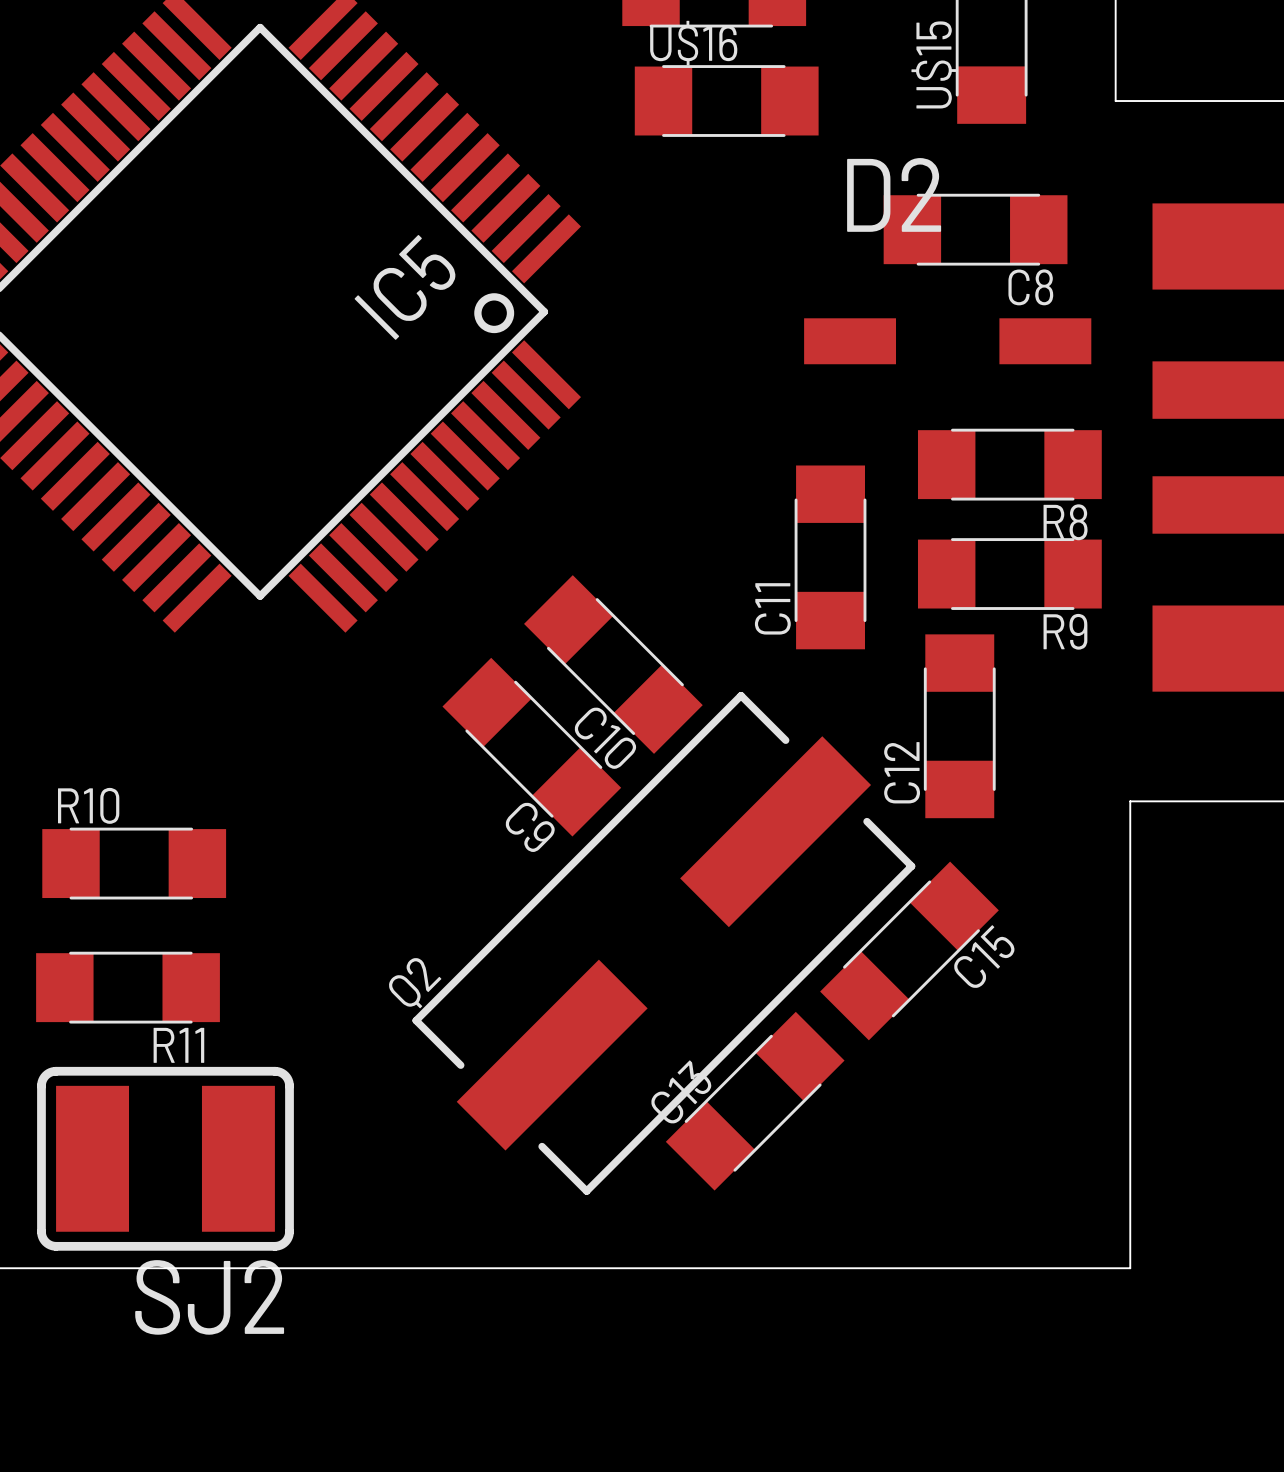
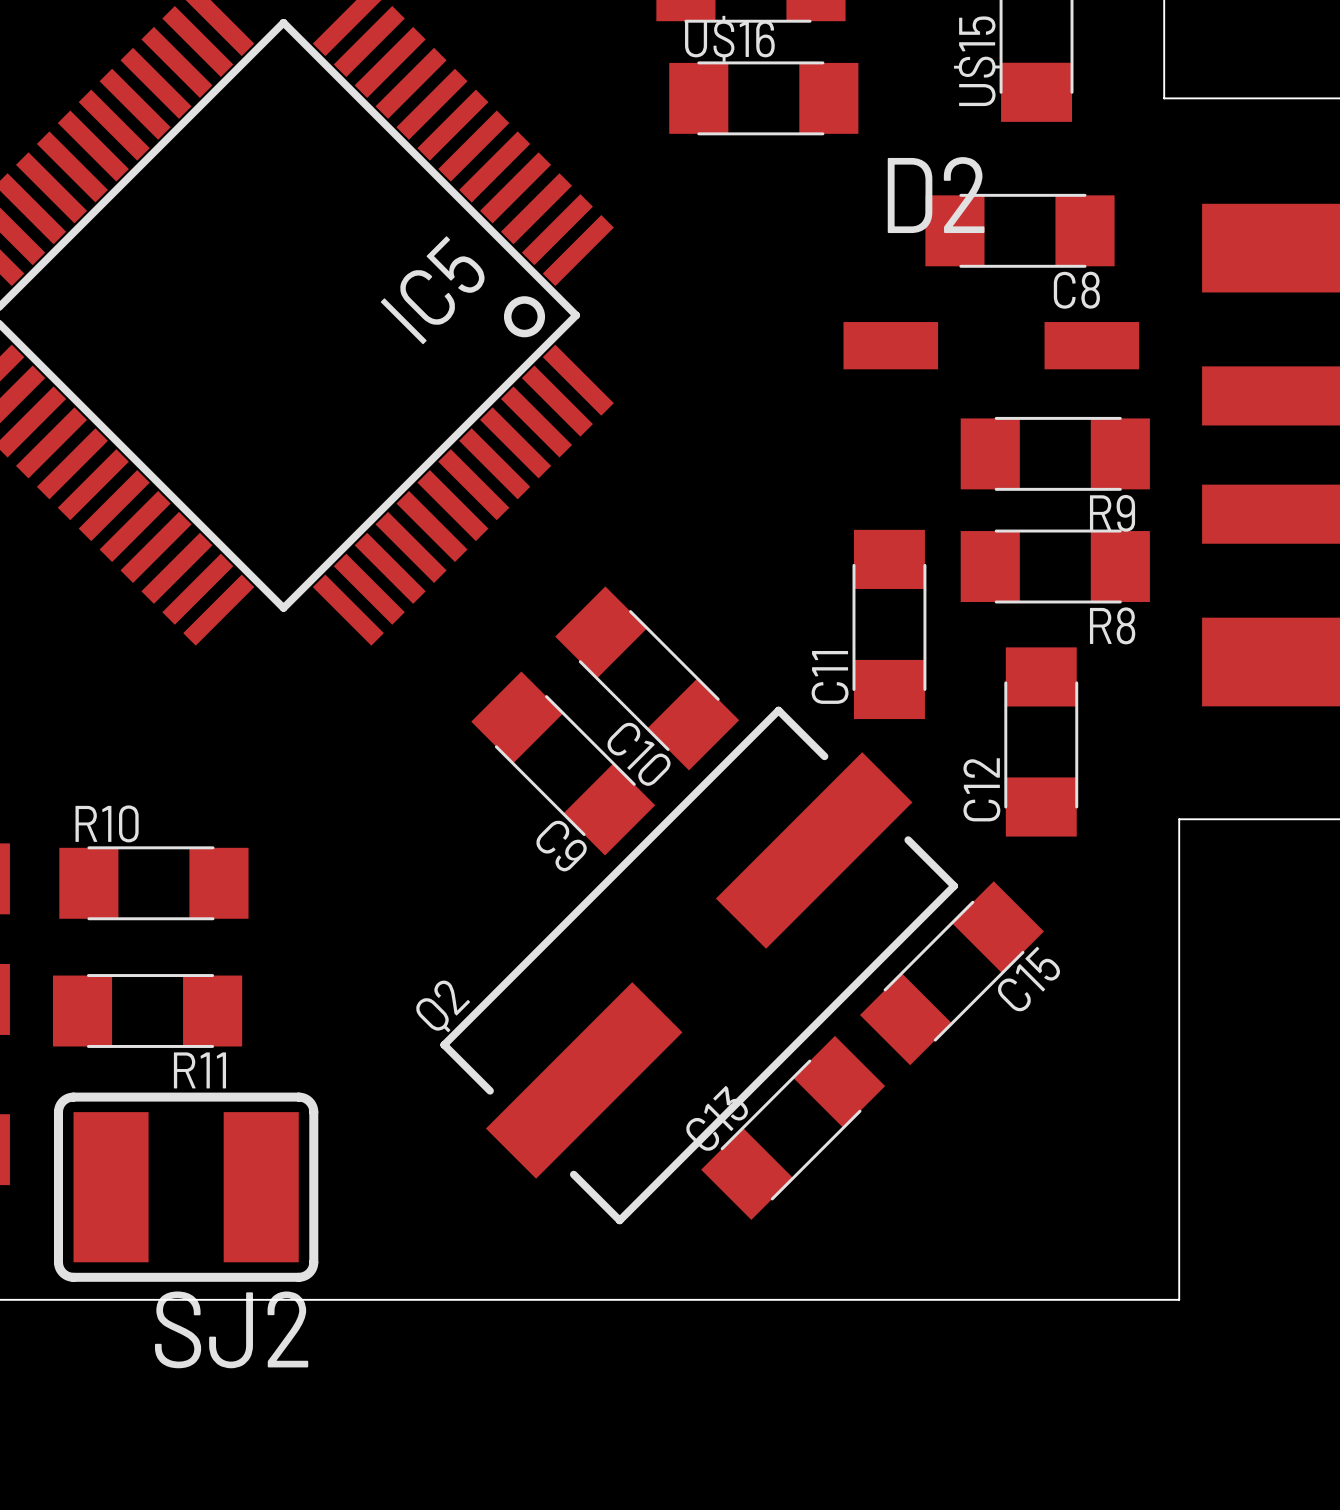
R8 position: (1009, 464) -> (1055, 566)
C11 position: (830, 557) -> (889, 624)
R9 position: (1009, 574) -> (1055, 453)
C12 position: (959, 726) -> (1041, 741)

